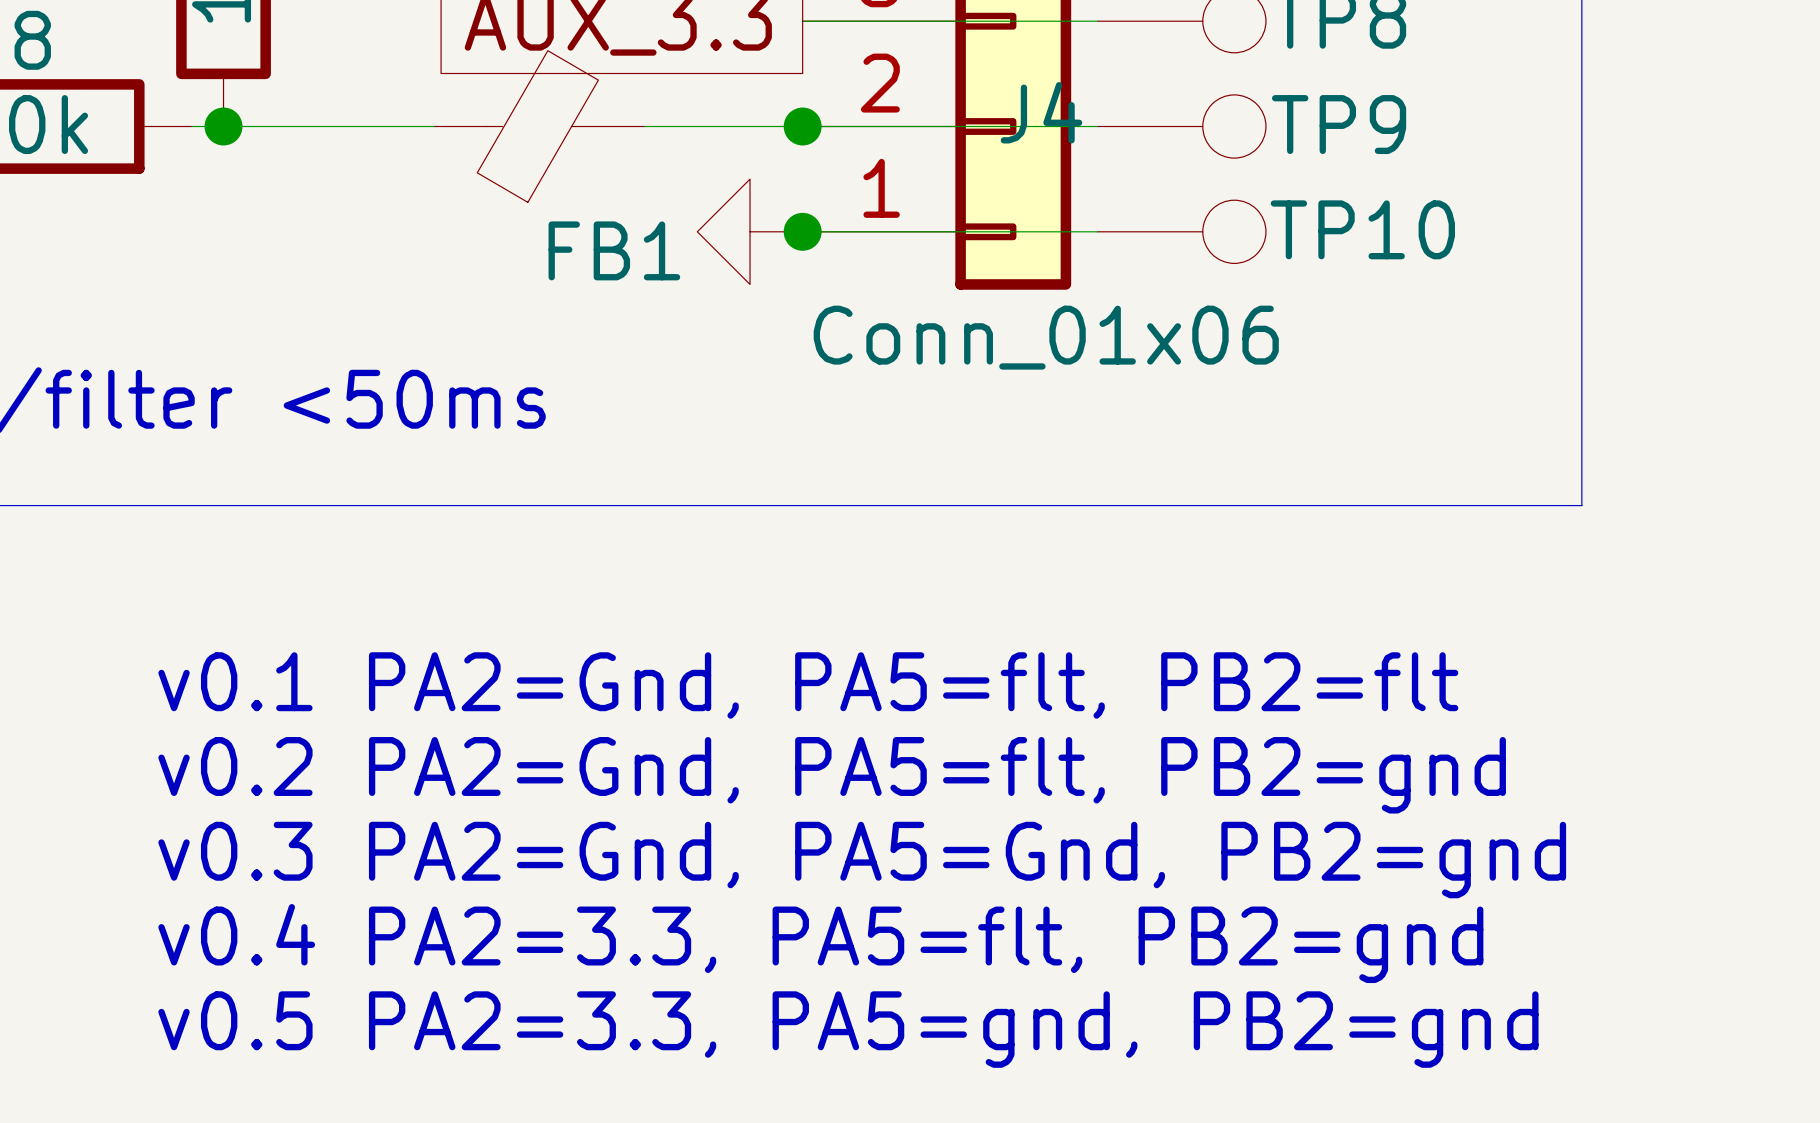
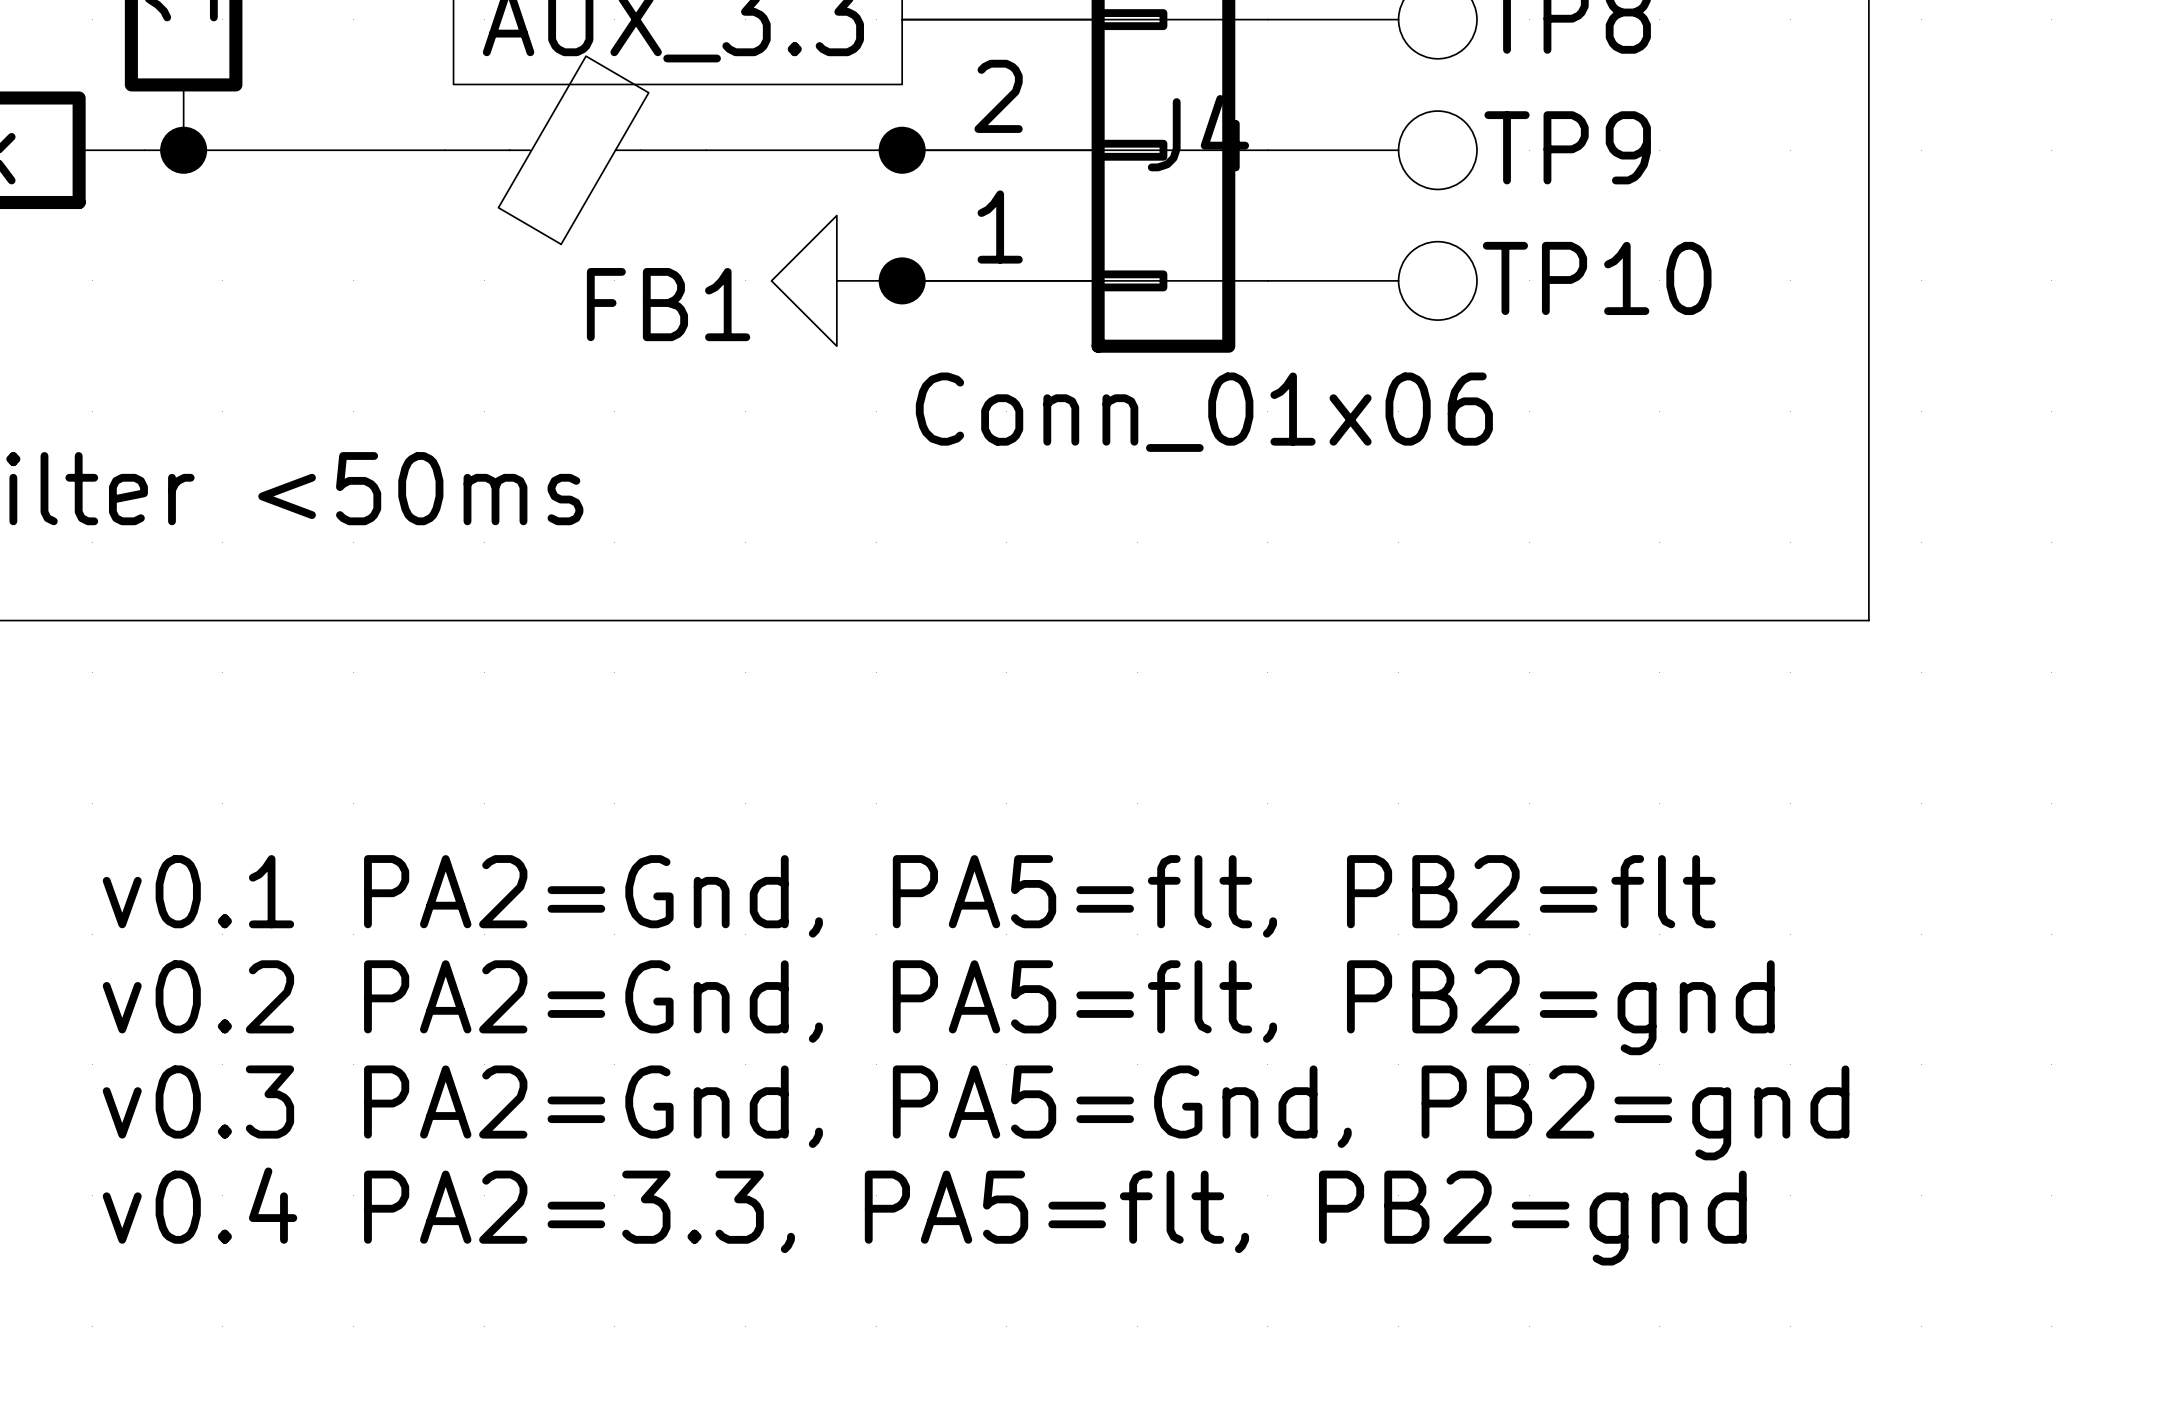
text position: v0.1 PA2=Gnd, PA5=flt, PB2=flt (808, 685) -> v0.1 PA2=Gnd, PA5=flt, PB2=flt (909, 896)
text position: v0.2 PA2=Gnd, PA5=flt, PB2=gnd (832, 775) -> v0.2 PA2=Gnd, PA5=flt, PB2=gnd (938, 1007)
text position: v0.3 PA2=Gnd, PA5=Gnd, PB2=gnd (862, 860) -> v0.3 PA2=Gnd, PA5=Gnd, PB2=gnd (976, 1112)
text position: v0.4 PA2=3.3, PA5=flt, PB2=gnd (820, 943) -> v0.4 PA2=3.3, PA5=flt, PB2=gnd (924, 1216)
text: v0.5 PA2=3.3, PA5=gnd, PB2=gnd (848, 1029) -> none

